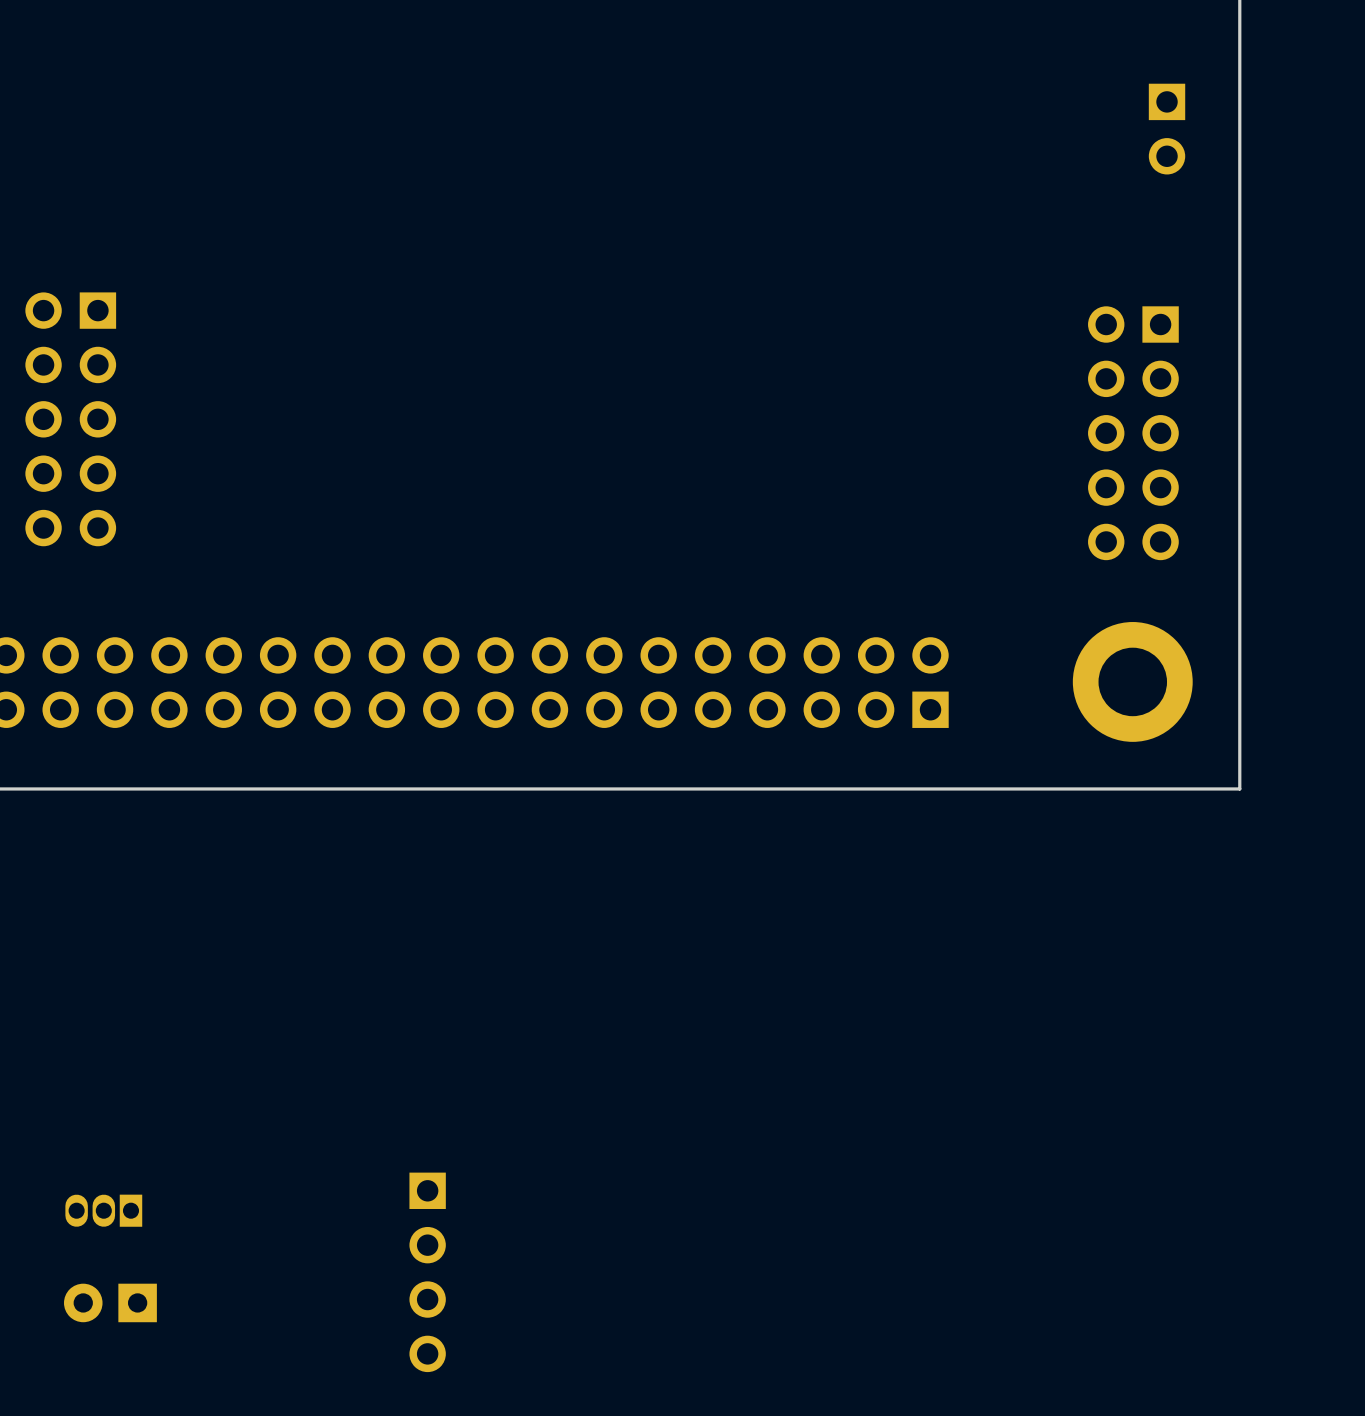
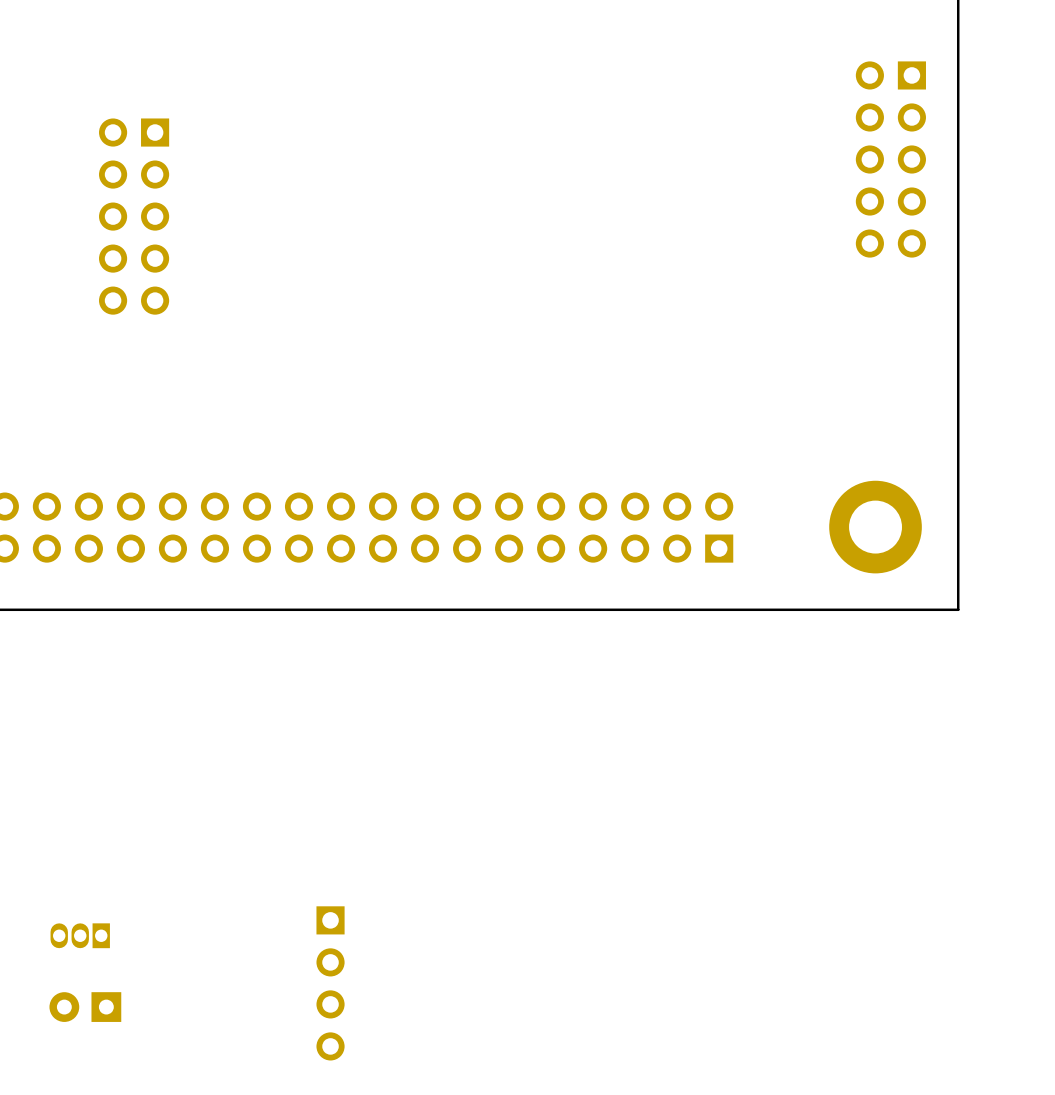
part: (1167, 129) -> none
part position: (70, 419) -> (134, 216)
part position: (1133, 433) -> (890, 159)

